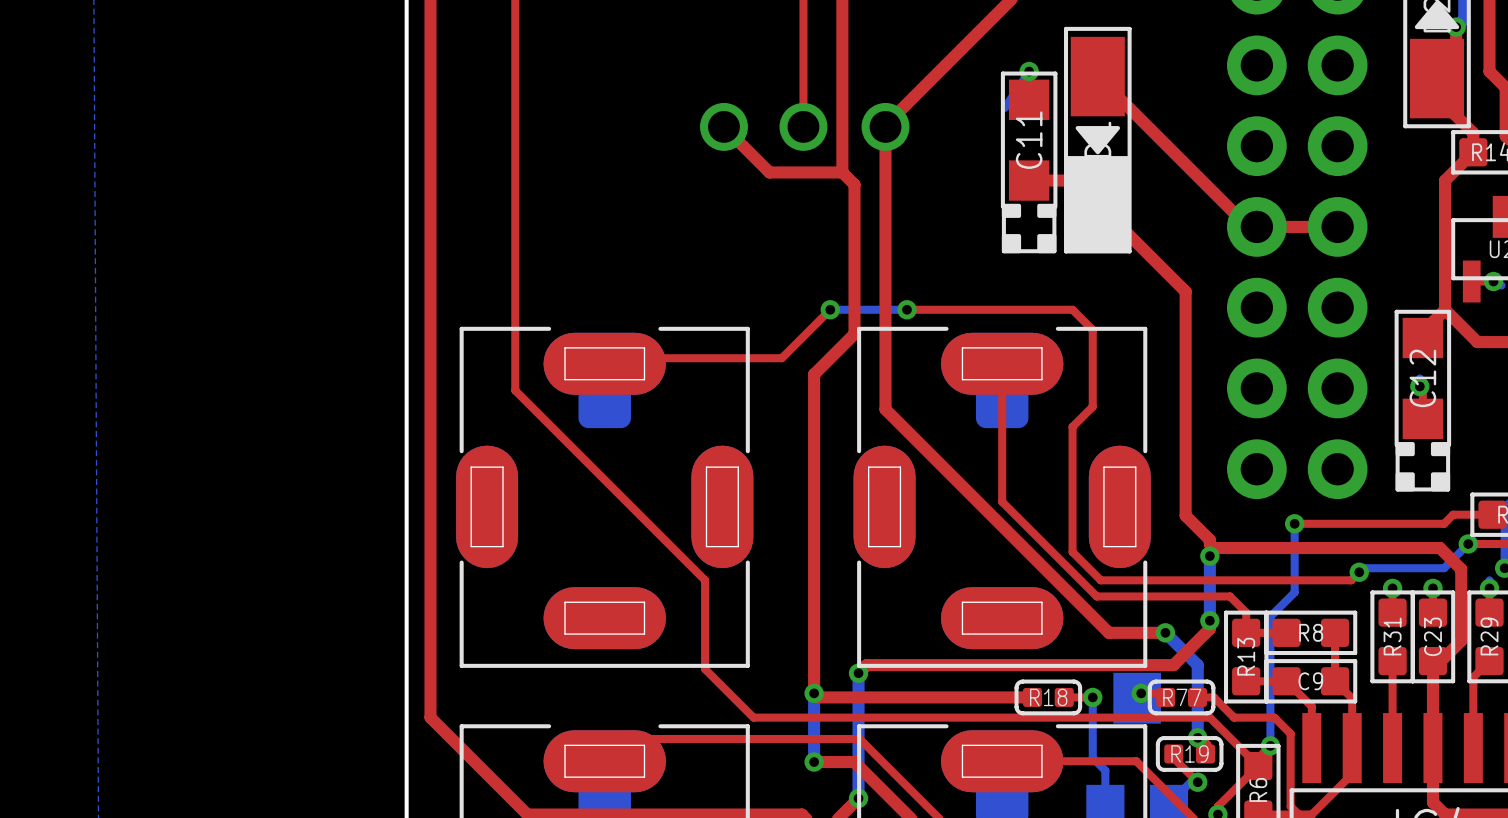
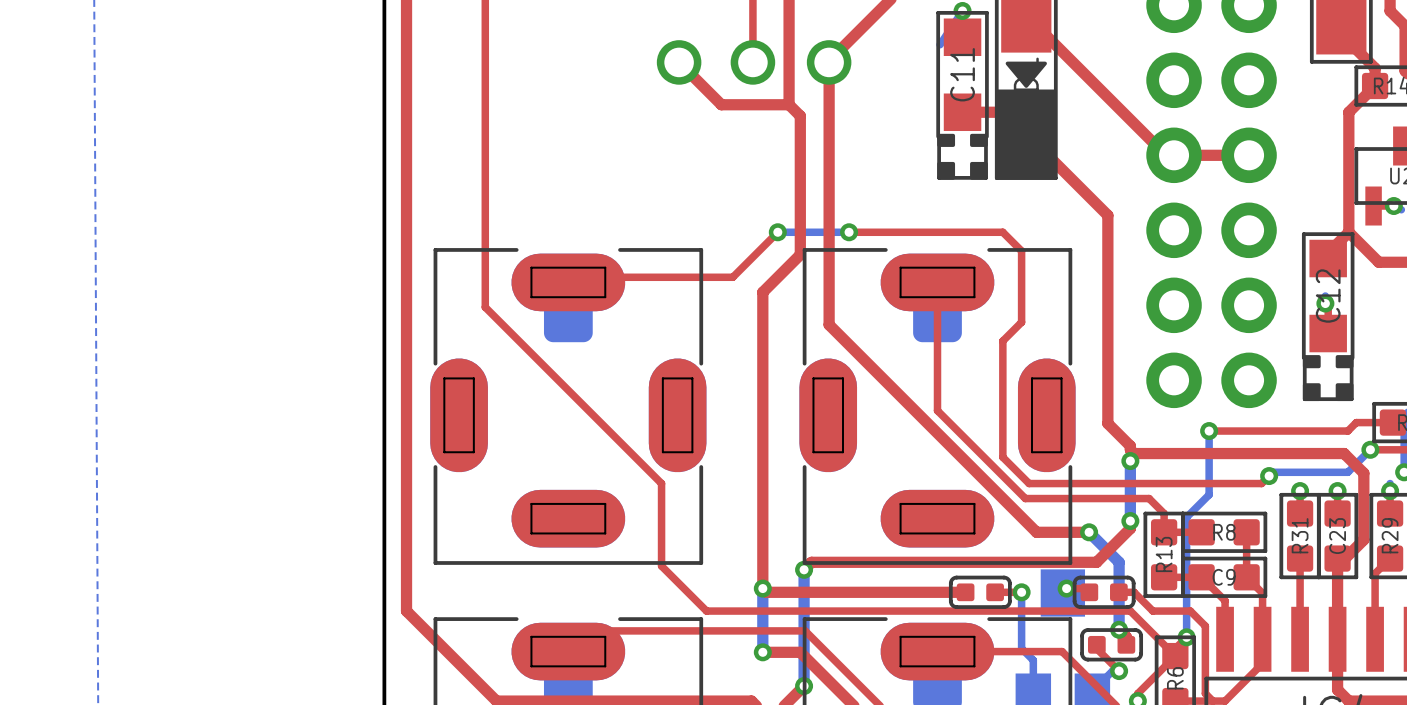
R18 name: R18 (1048, 697) -> none
R77 name: R77 (1182, 697) -> none
R19 name: R19 (1190, 753) -> none

